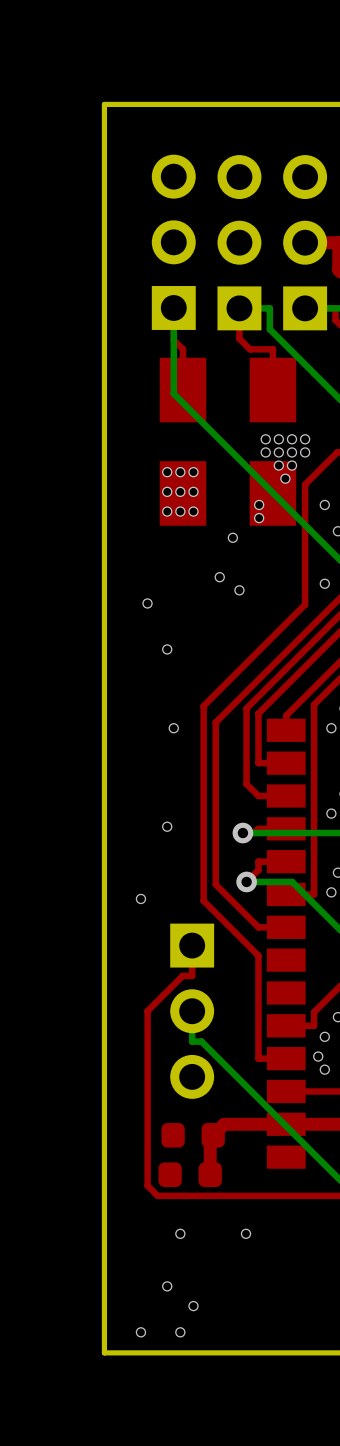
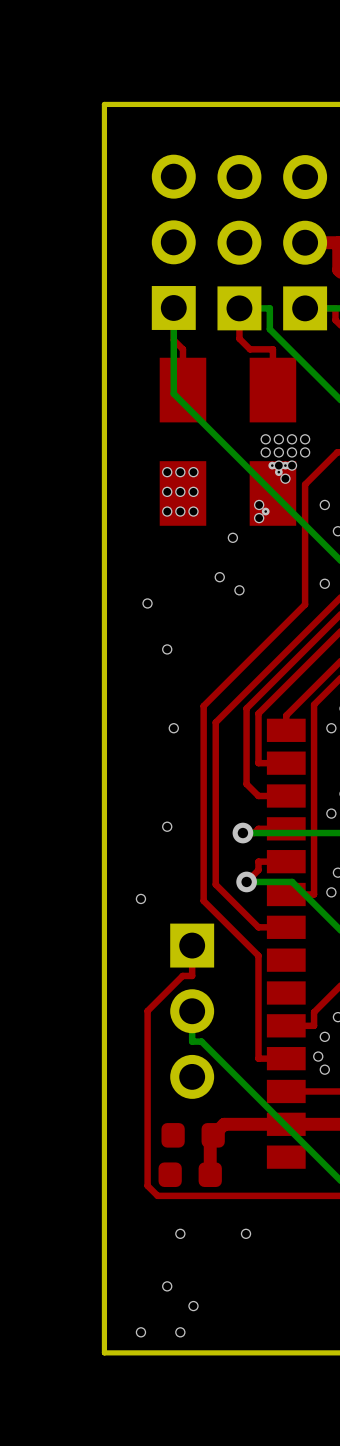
via: none -> (272, 465)
via: none -> (285, 465)
via: none -> (278, 472)
via: none -> (265, 511)

